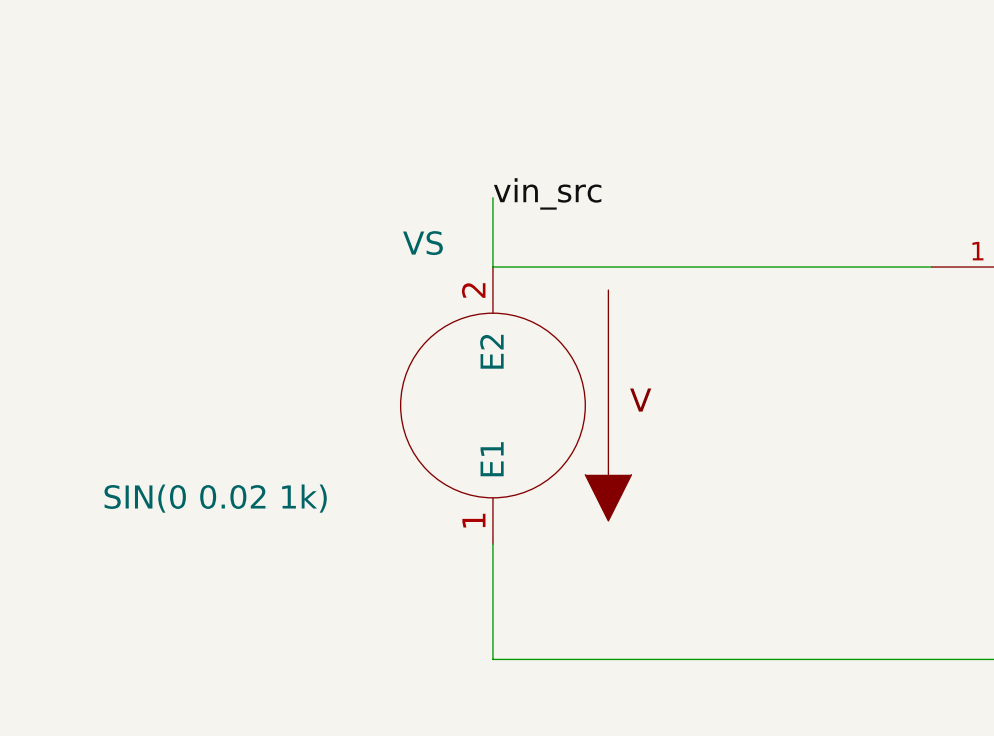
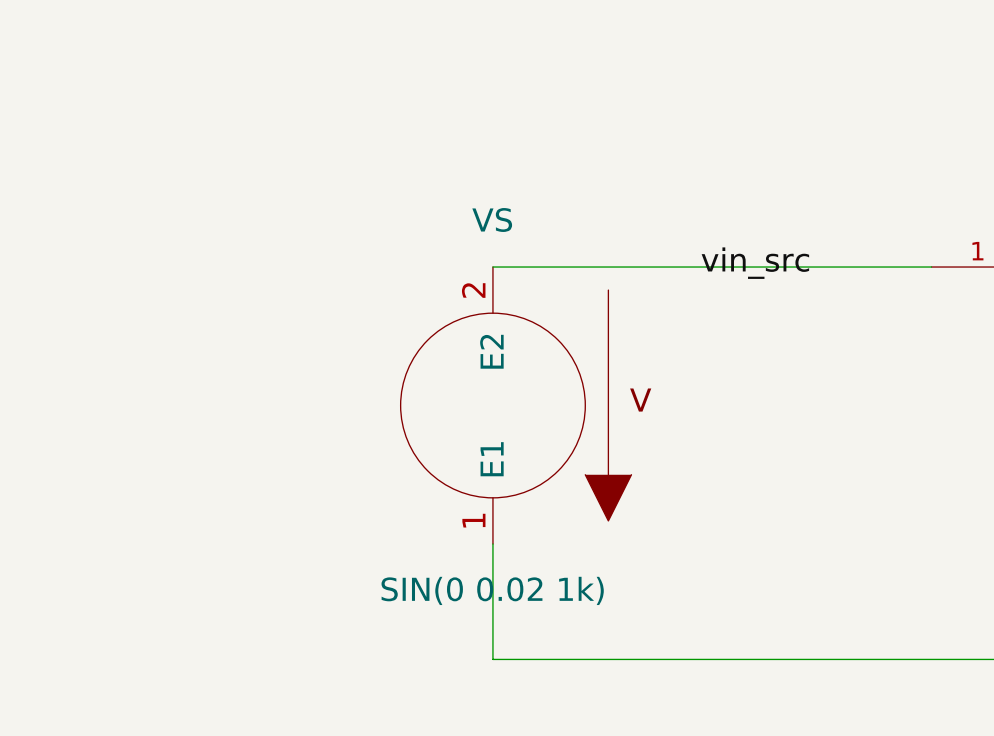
label position: vin_src (547, 193) -> vin_src (755, 263)
wire: (492, 197) (492, 267) -> none
VS name position: VS (422, 243) -> VS (492, 220)
VS value position: SIN(0 0.02 1k) (215, 498) -> SIN(0 0.02 1k) (492, 590)

